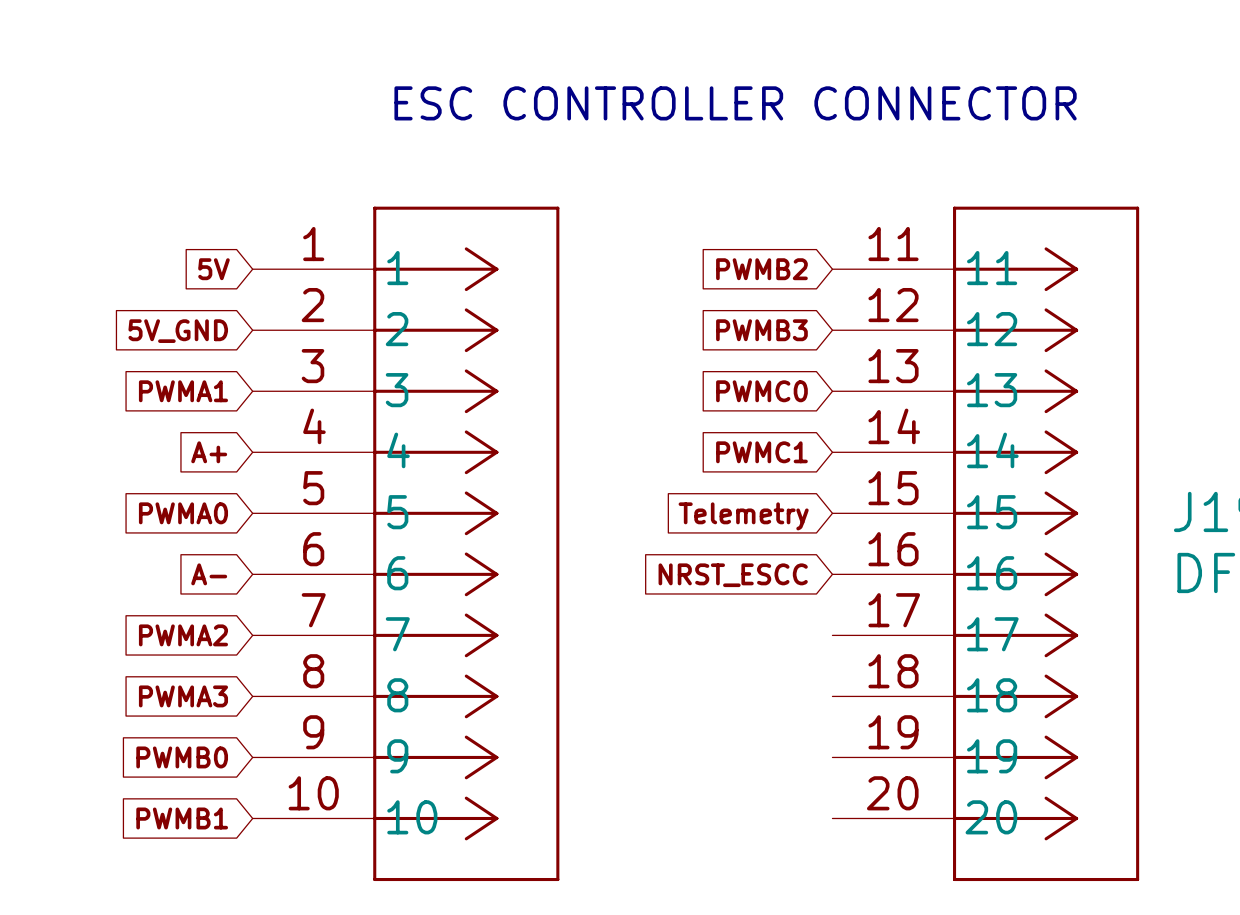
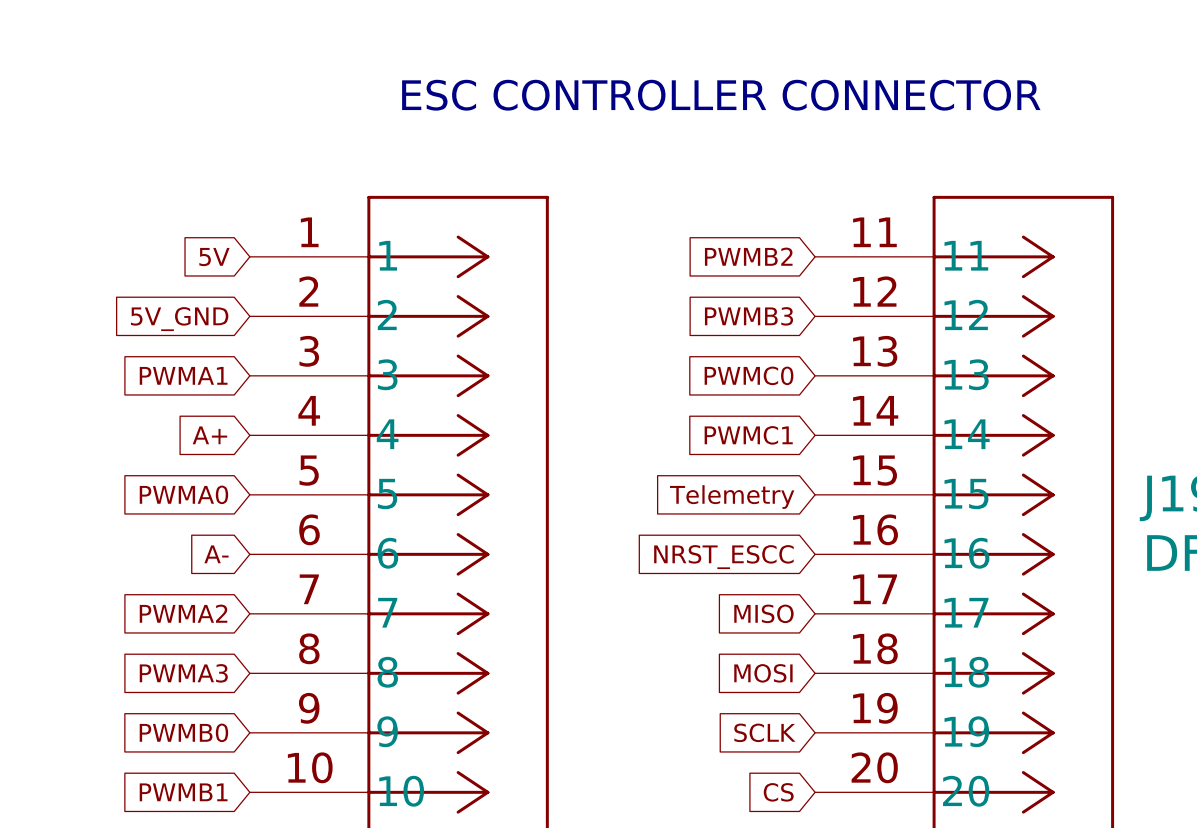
global label: none -> MISO (763, 613)
global label: none -> MOSI (763, 673)
global label: none -> SCLK (764, 732)
global label: none -> CS (778, 792)

